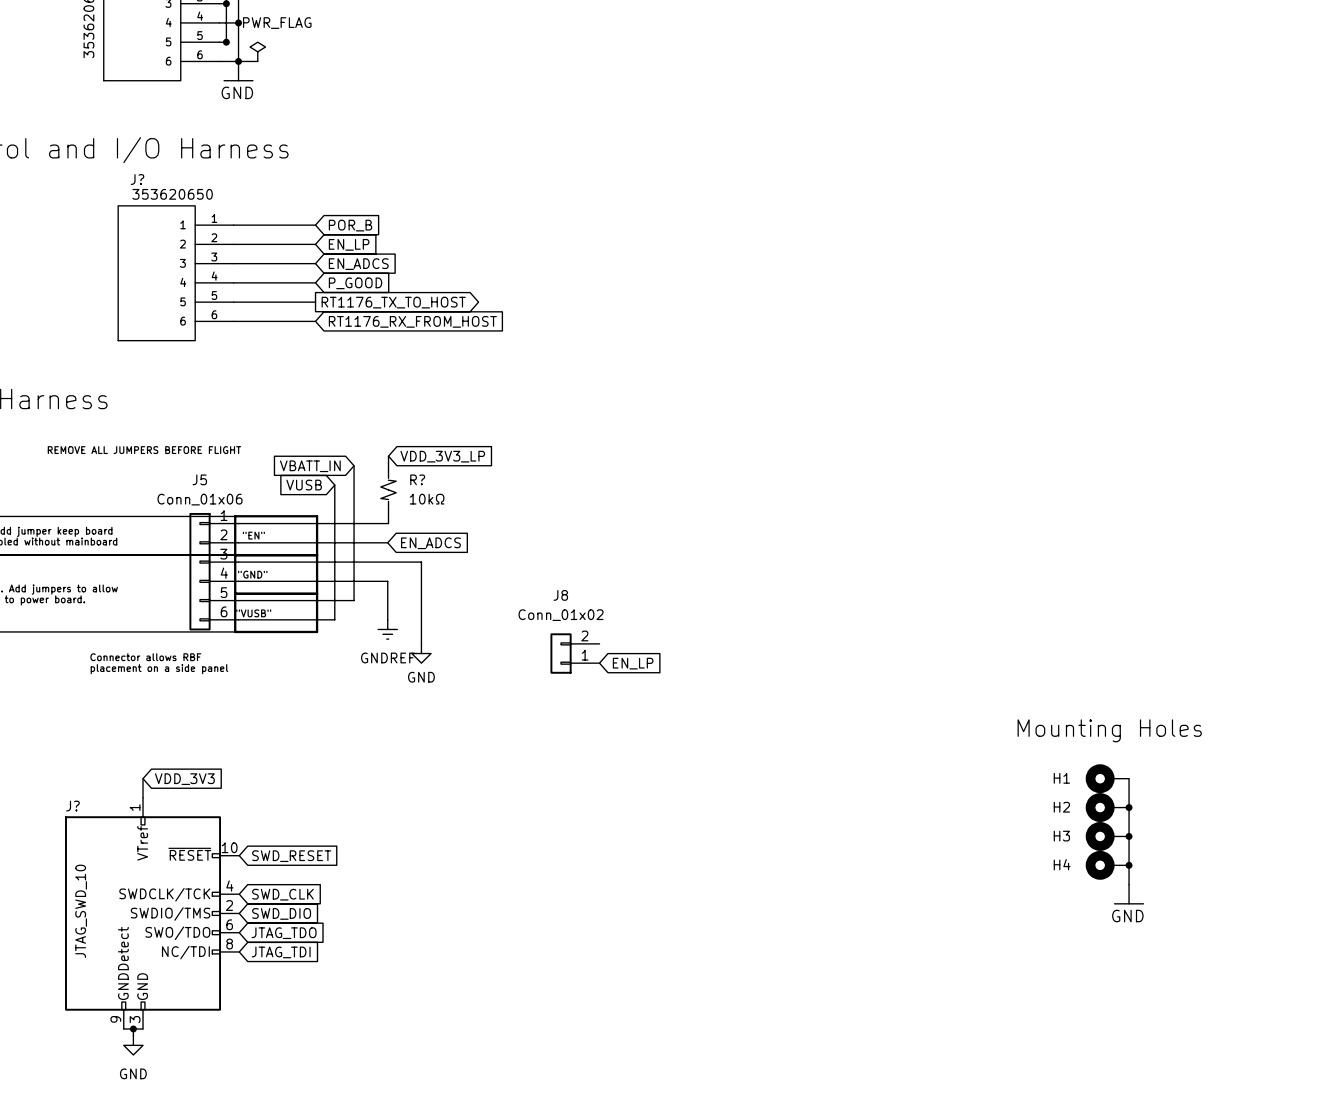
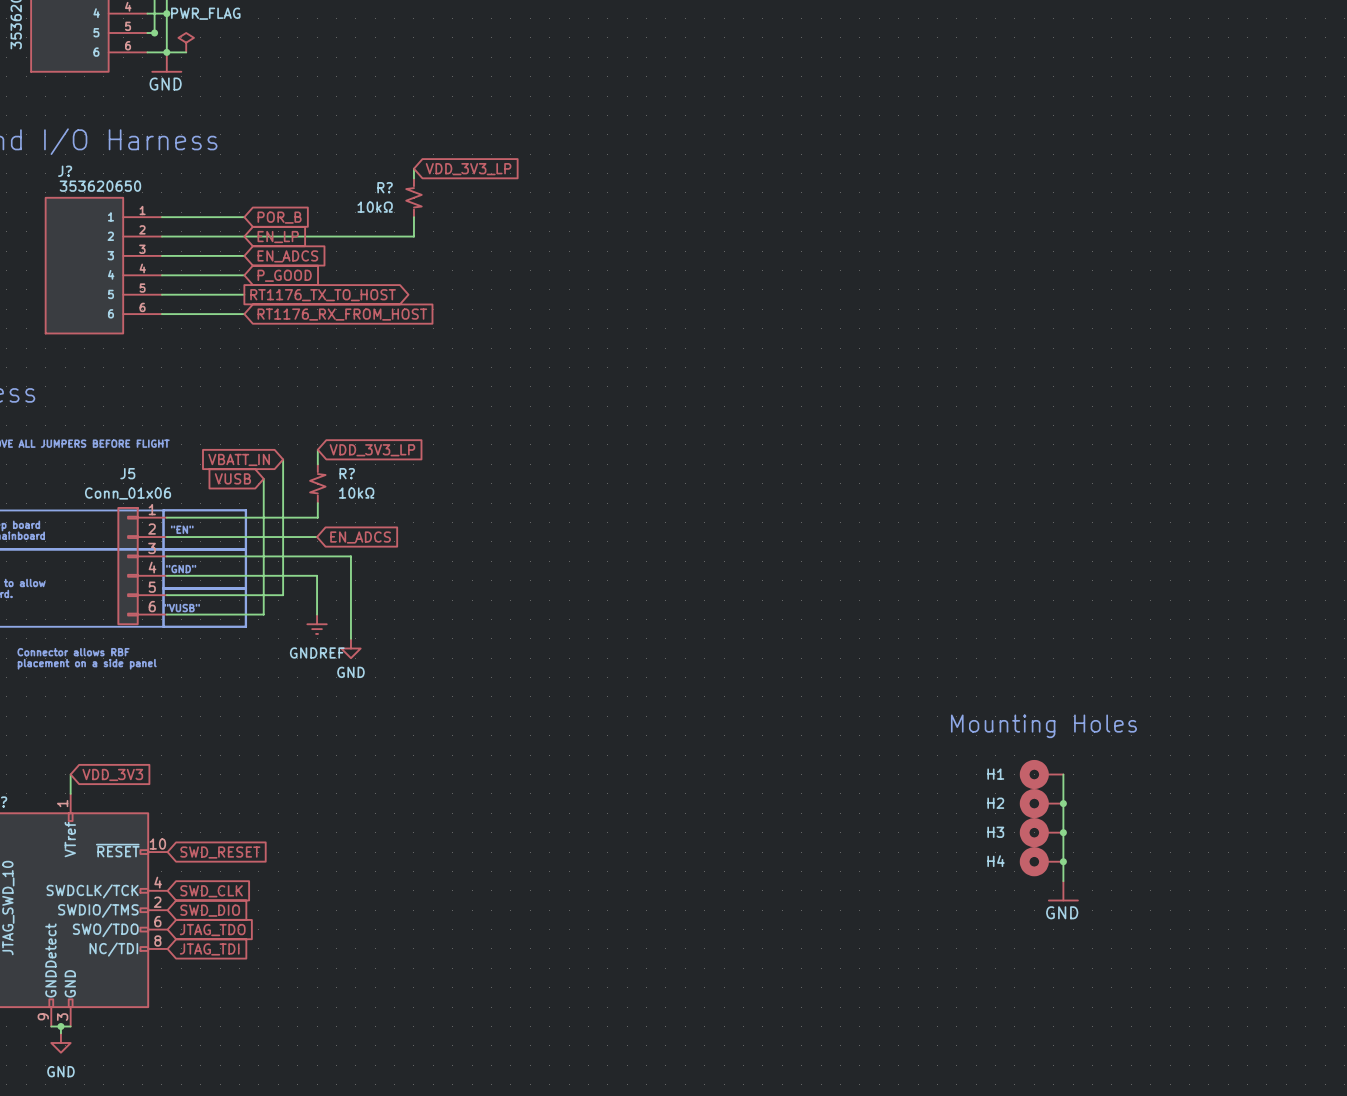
wire: none -> (413, 168) (413, 178)
global label: none -> VDD_3V3_LP (468, 169)
R?: none -> 10kΩ (413, 197)
wire: none -> (413, 217) (413, 236) (244, 236)
J8: Conn_01x02 (574, 653) -> none
global label: EN_LP (633, 663) -> none

